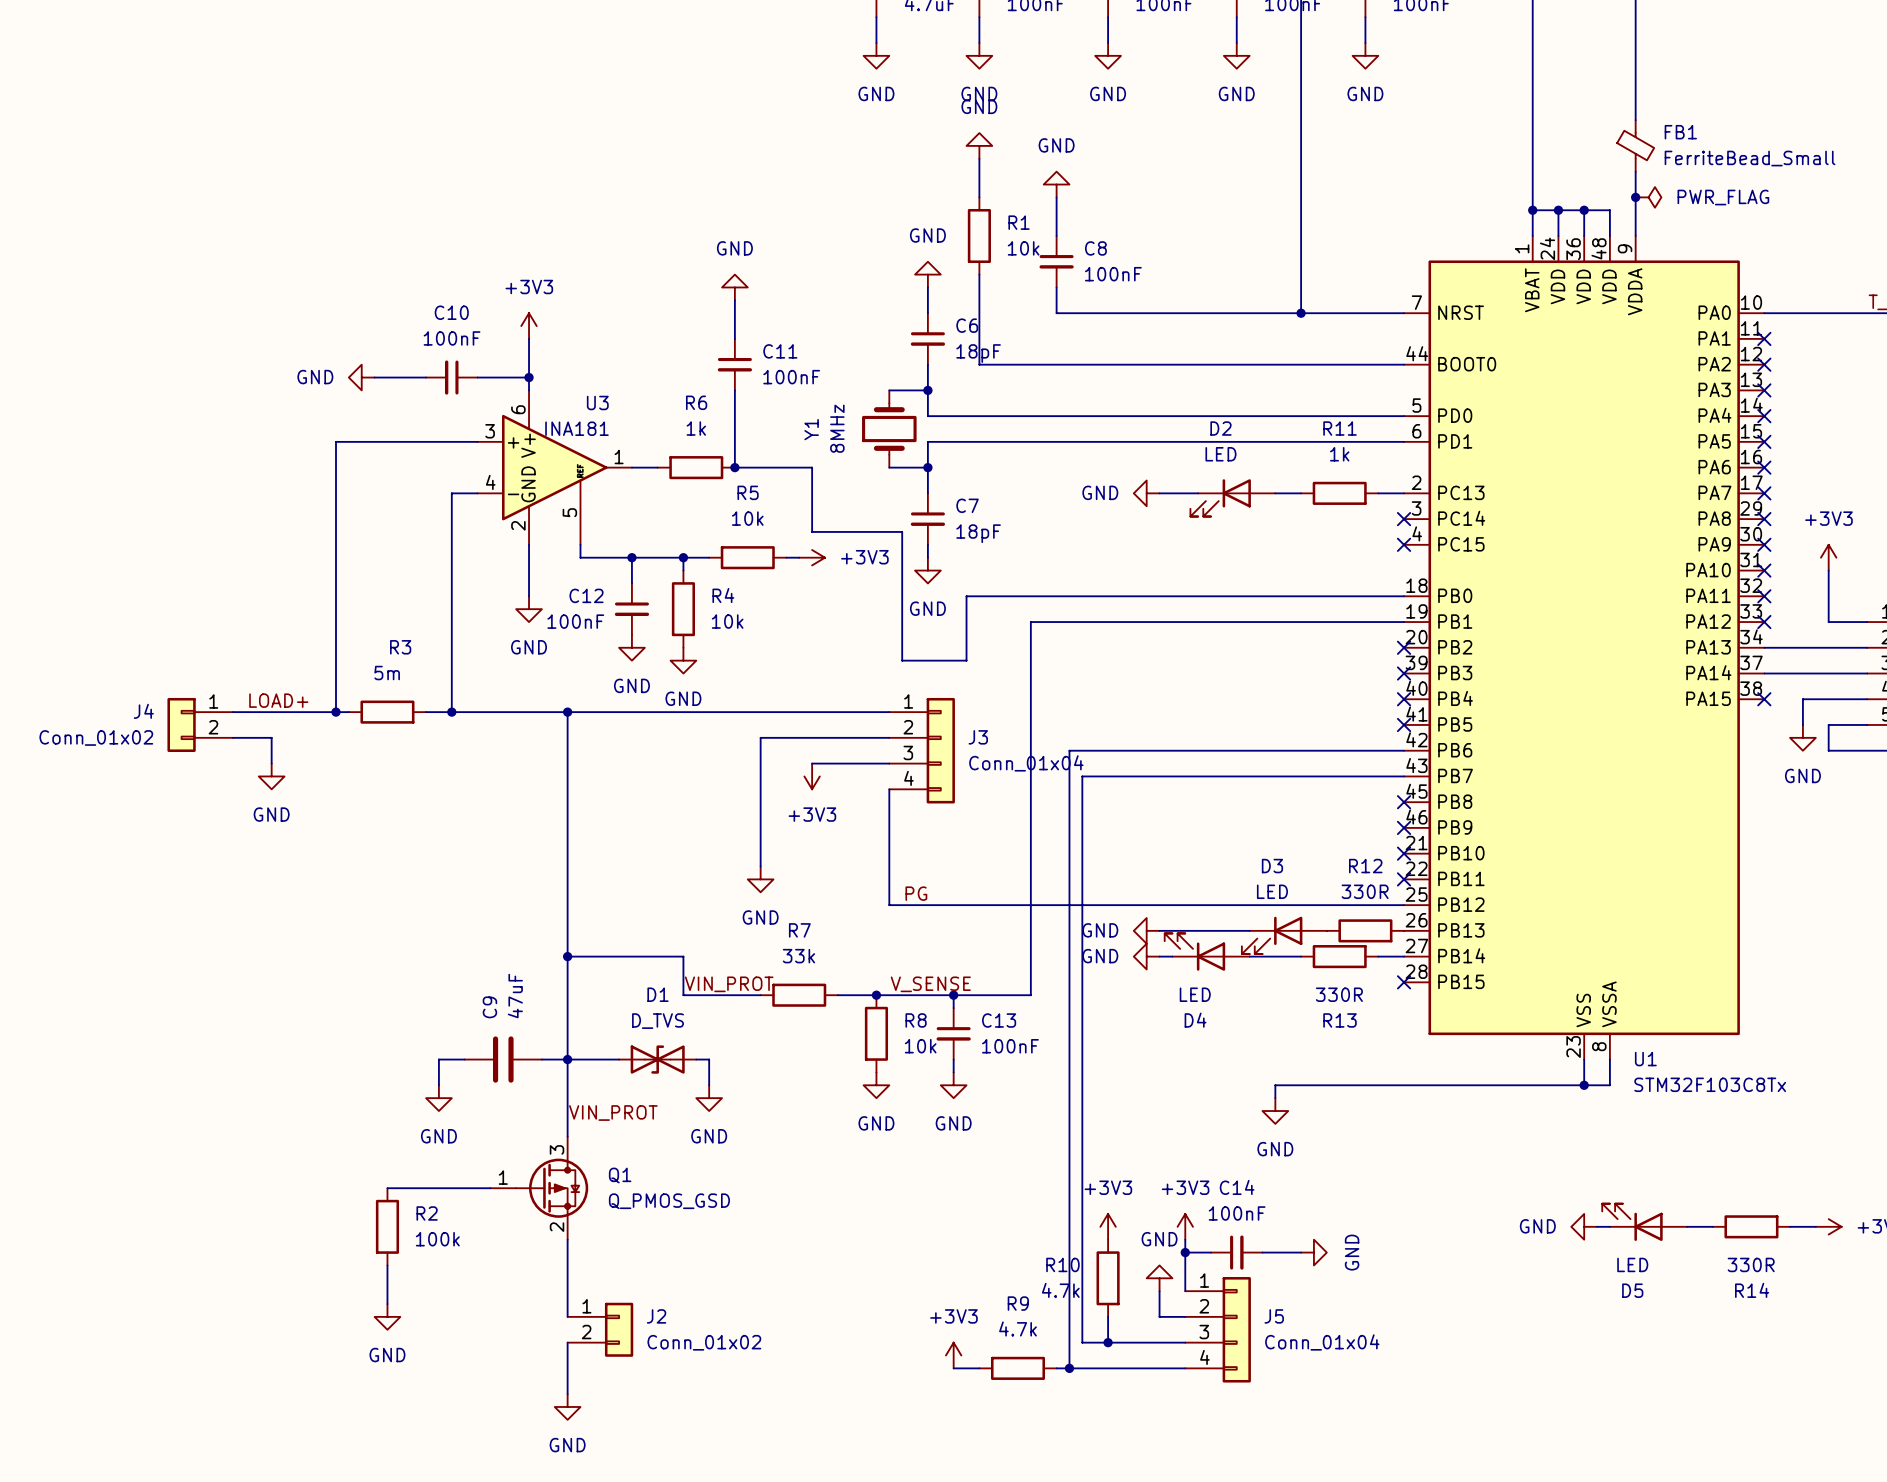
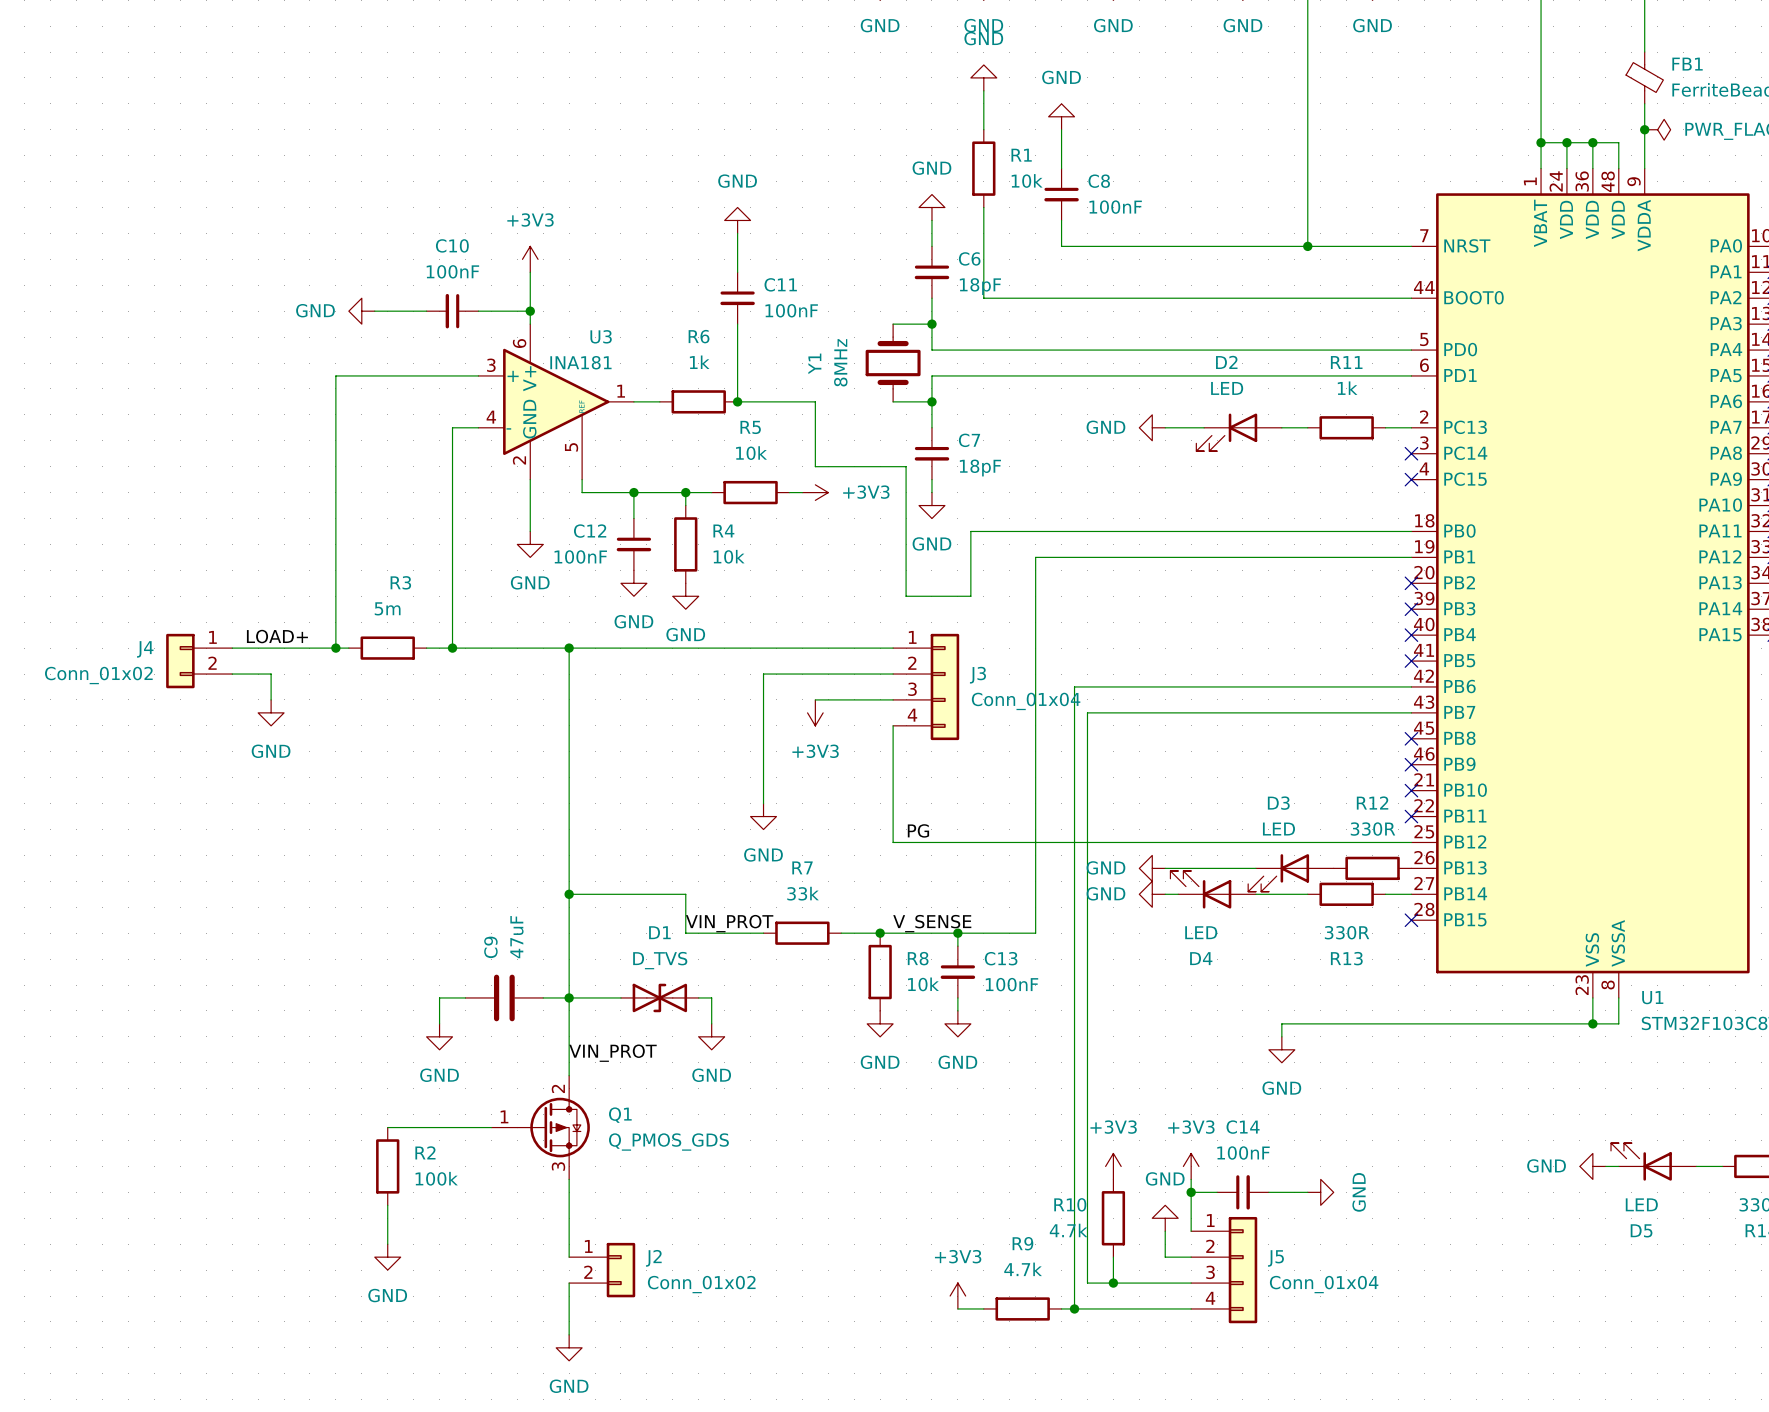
Q1 pin number: 3 (557, 1149) -> 2 (558, 1088)
Q1 value: Q_PMOS_GSD (669, 1201) -> Q_PMOS_GDS (668, 1142)
Q1 pin number: 2 (557, 1227) -> 3 (558, 1166)

